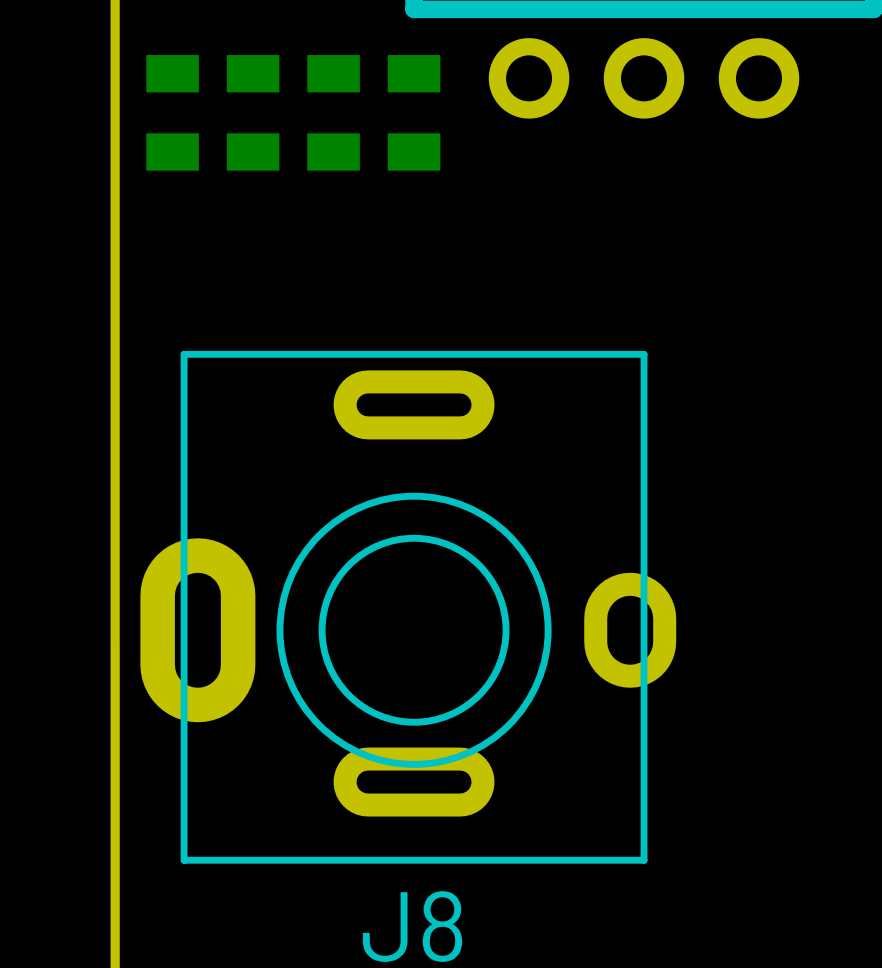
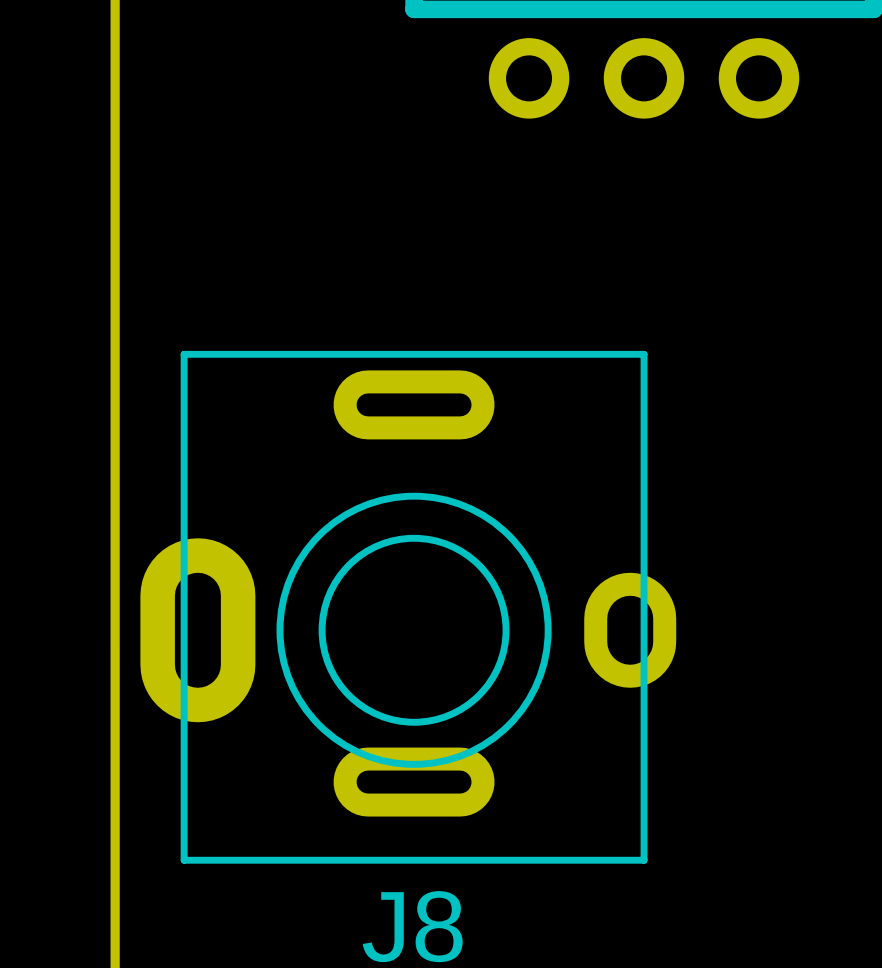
part: (172, 112) -> none
part: (253, 112) -> none
part: (333, 112) -> none
part: (414, 112) -> none

